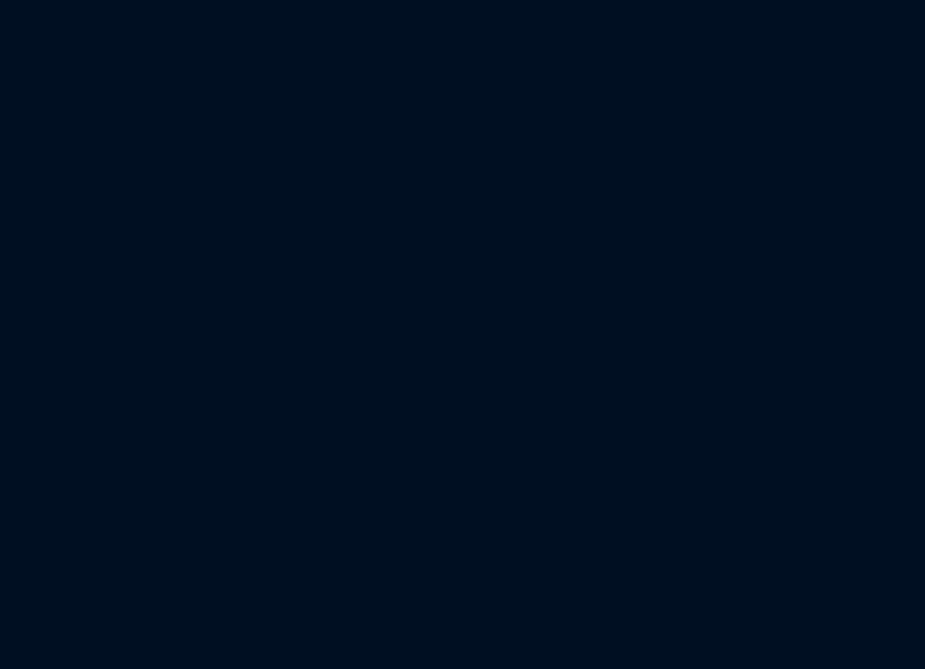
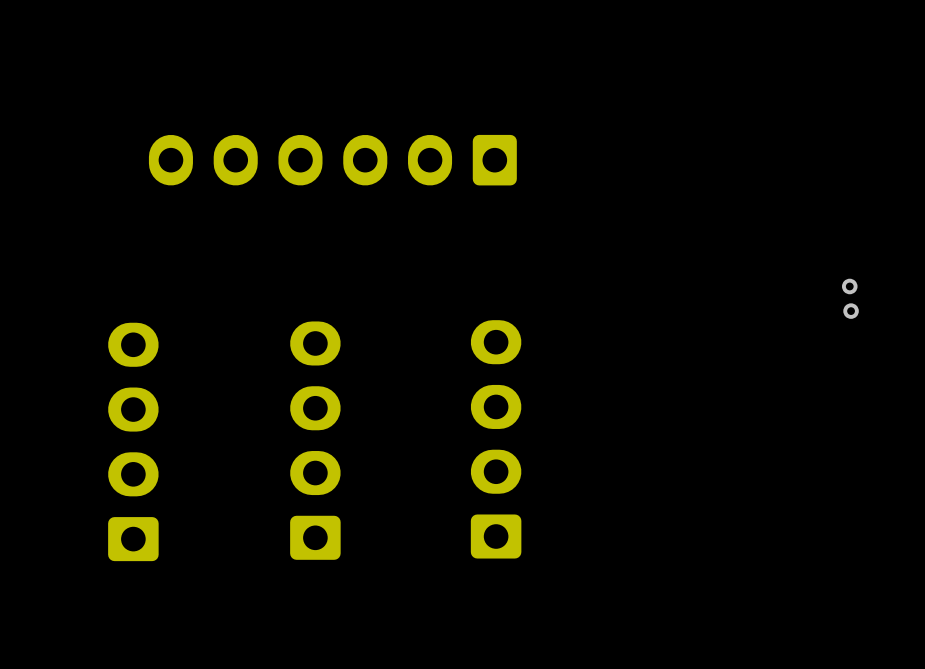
part: none -> (332, 160)
via: none -> (849, 286)
via: none -> (851, 311)
part: none -> (496, 439)
part: none -> (315, 440)
part: none -> (133, 441)

